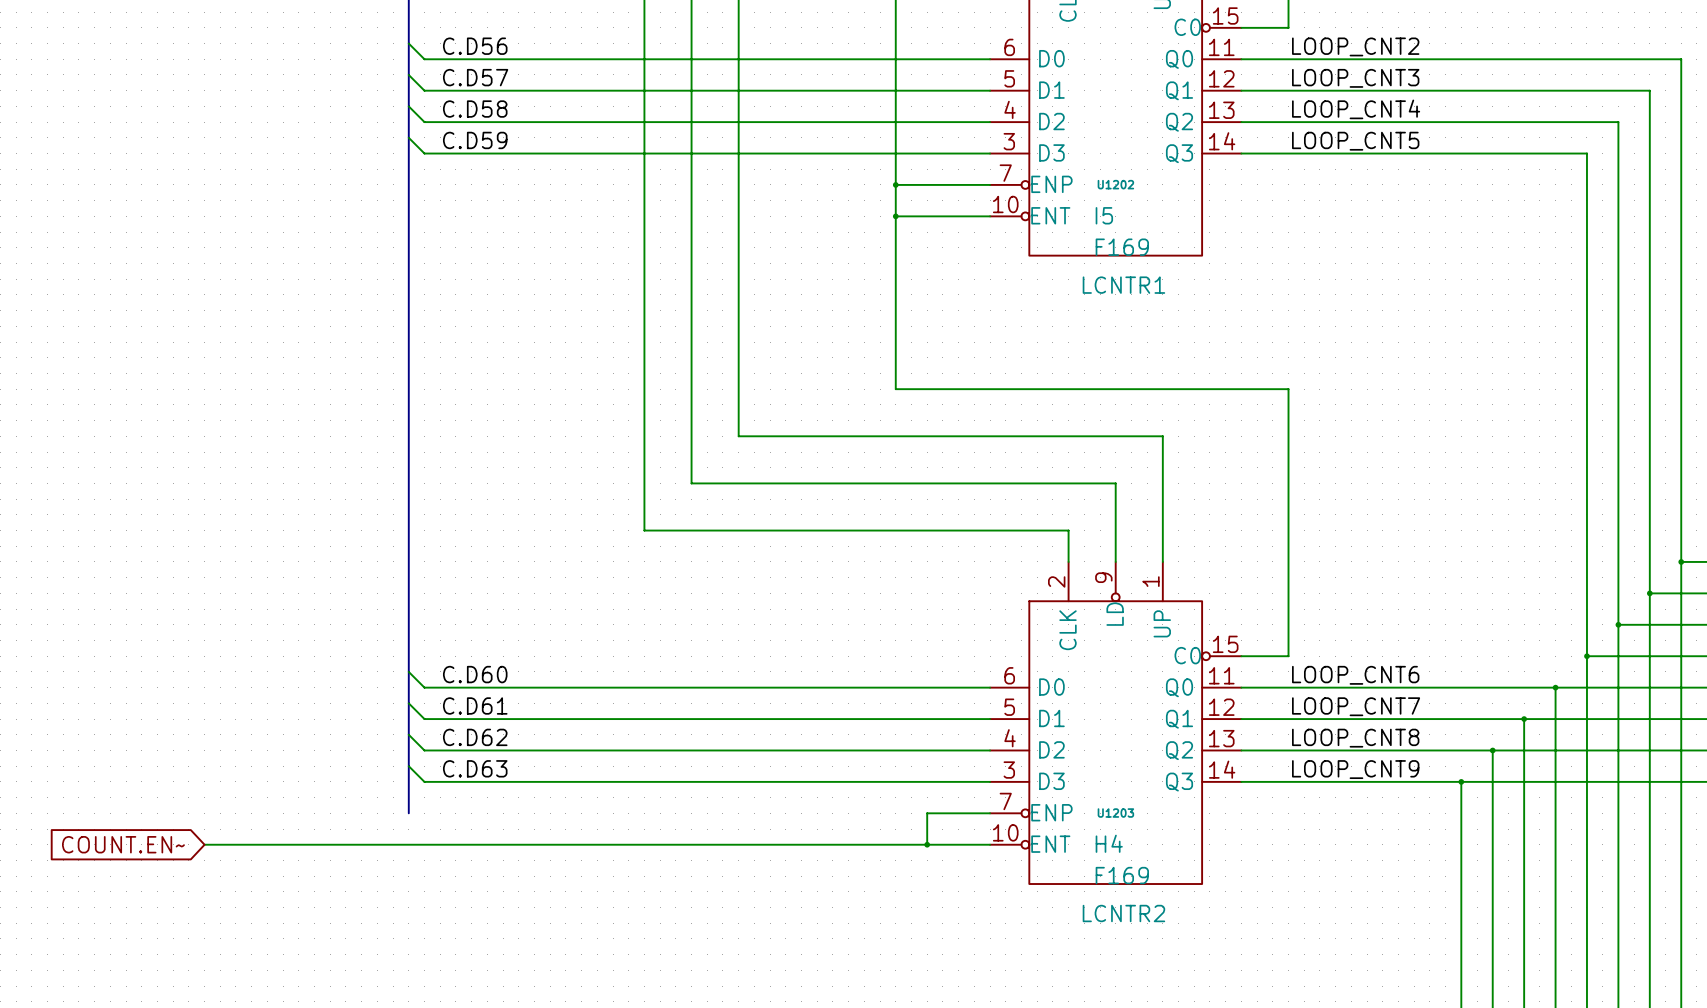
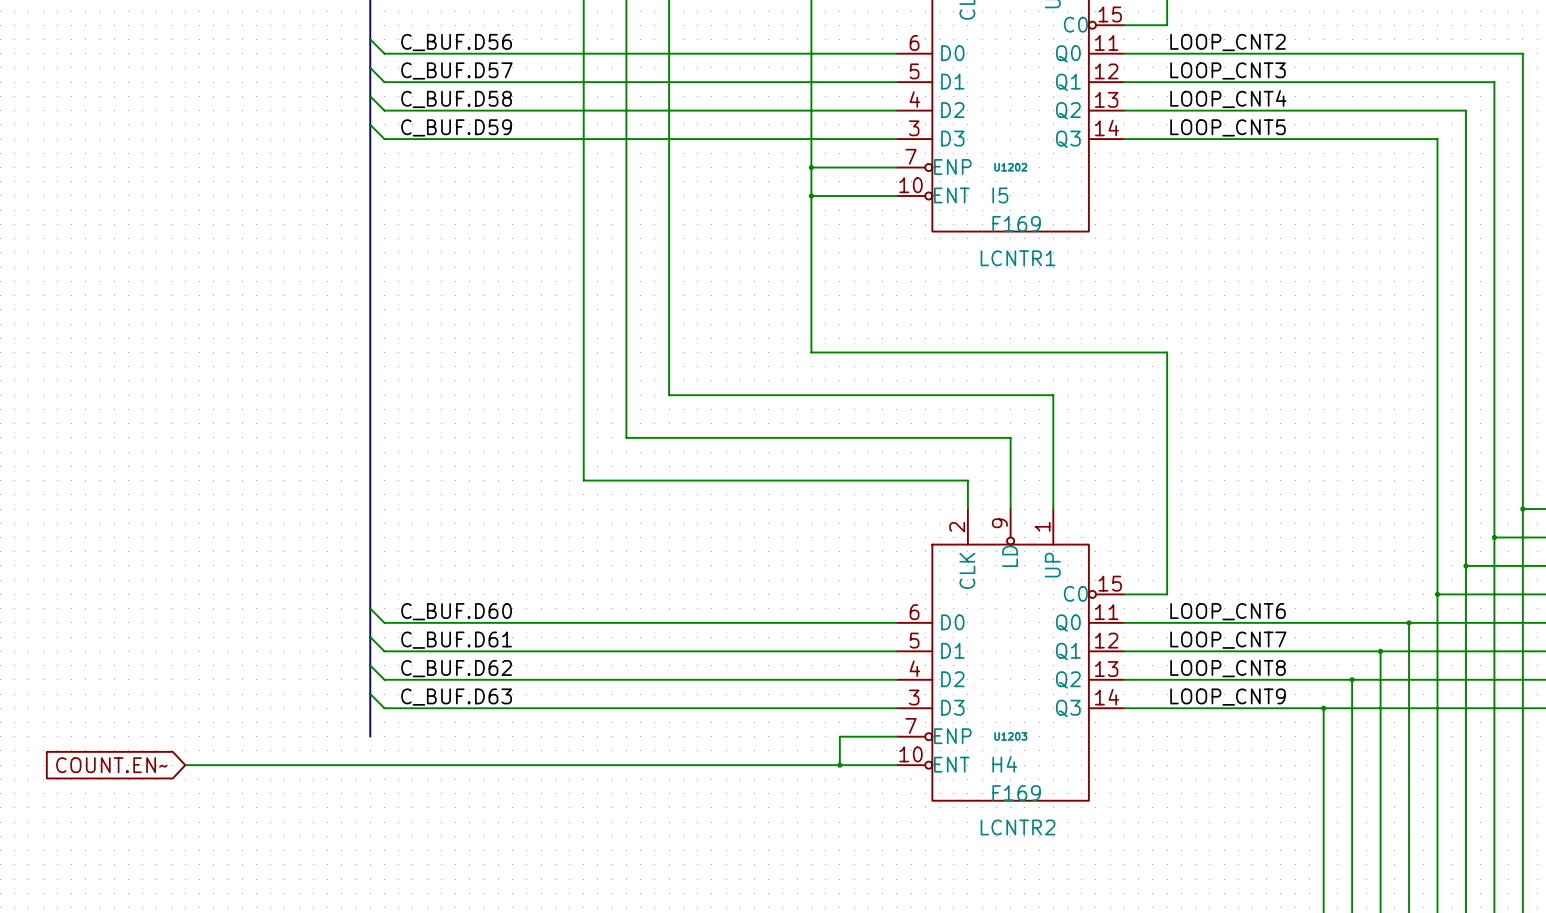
label: C.D56 (475, 46) -> C_BUF.D56 (456, 42)
label: C.D57 (475, 77) -> C_BUF.D57 (456, 70)
label: C.D58 (475, 109) -> C_BUF.D58 (456, 99)
label: C.D59 (475, 140) -> C_BUF.D59 (456, 127)
label: C.D60 (475, 674) -> C_BUF.D60 (456, 611)
label: C.D61 (475, 705) -> C_BUF.D61 (456, 640)
label: C.D62 (475, 737) -> C_BUF.D62 (456, 668)
label: C.D63 (475, 768) -> C_BUF.D63 (456, 697)

